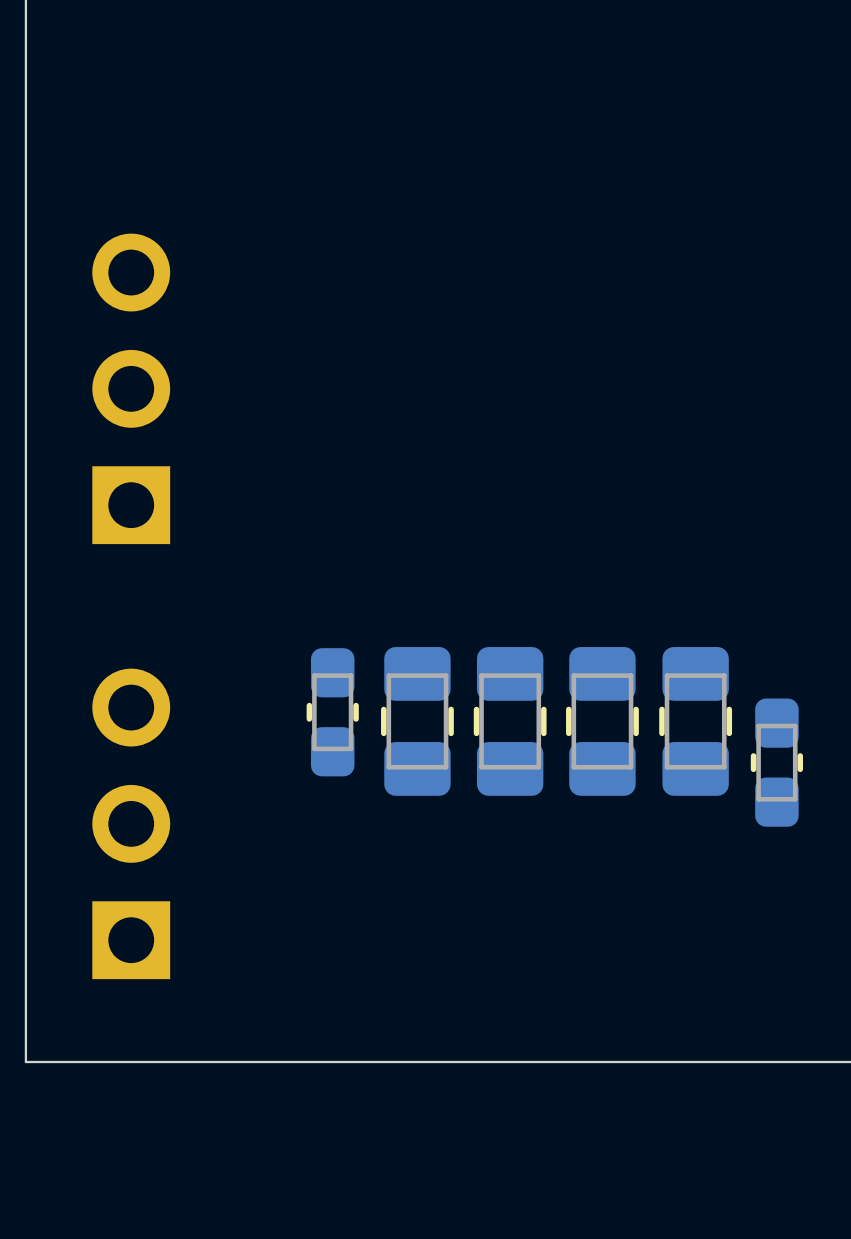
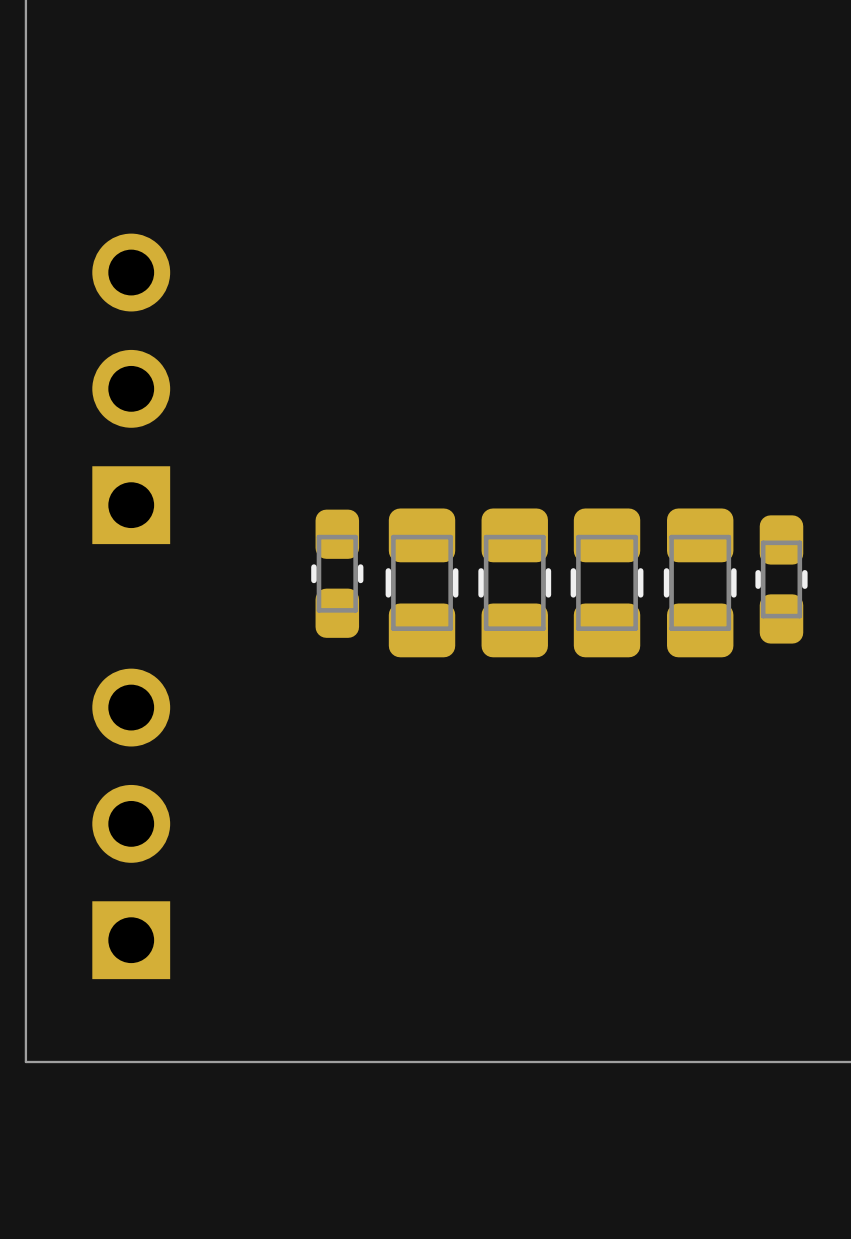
part: none -> (422, 582)
part: none -> (514, 582)
part: none -> (607, 582)
part: none -> (700, 582)
part position: (332, 712) -> (337, 573)
part: (417, 721) -> none
part: (510, 721) -> none
part: (602, 721) -> none
part: (695, 721) -> none
part position: (776, 762) -> (781, 579)

